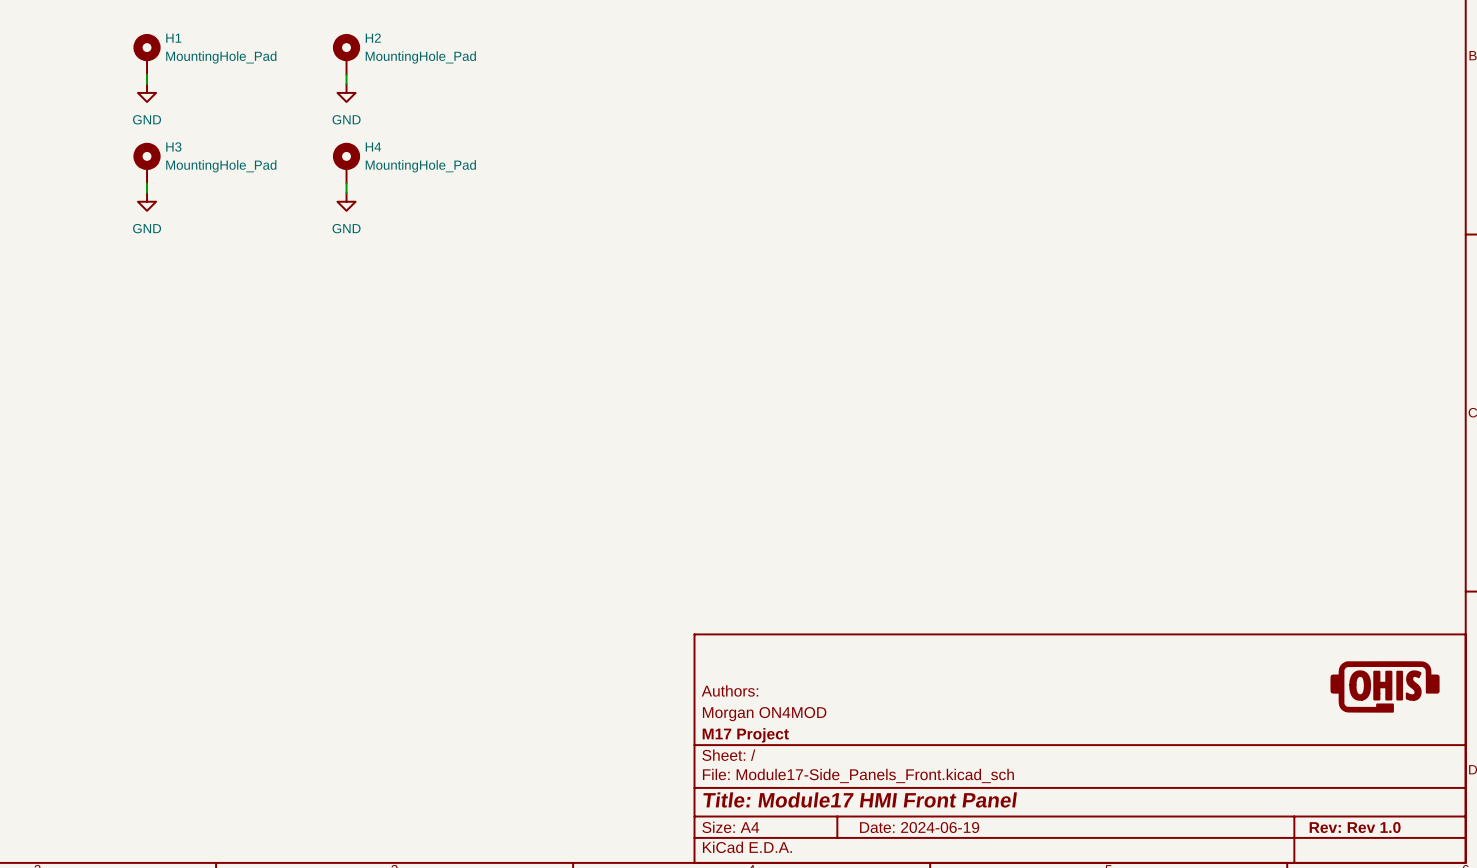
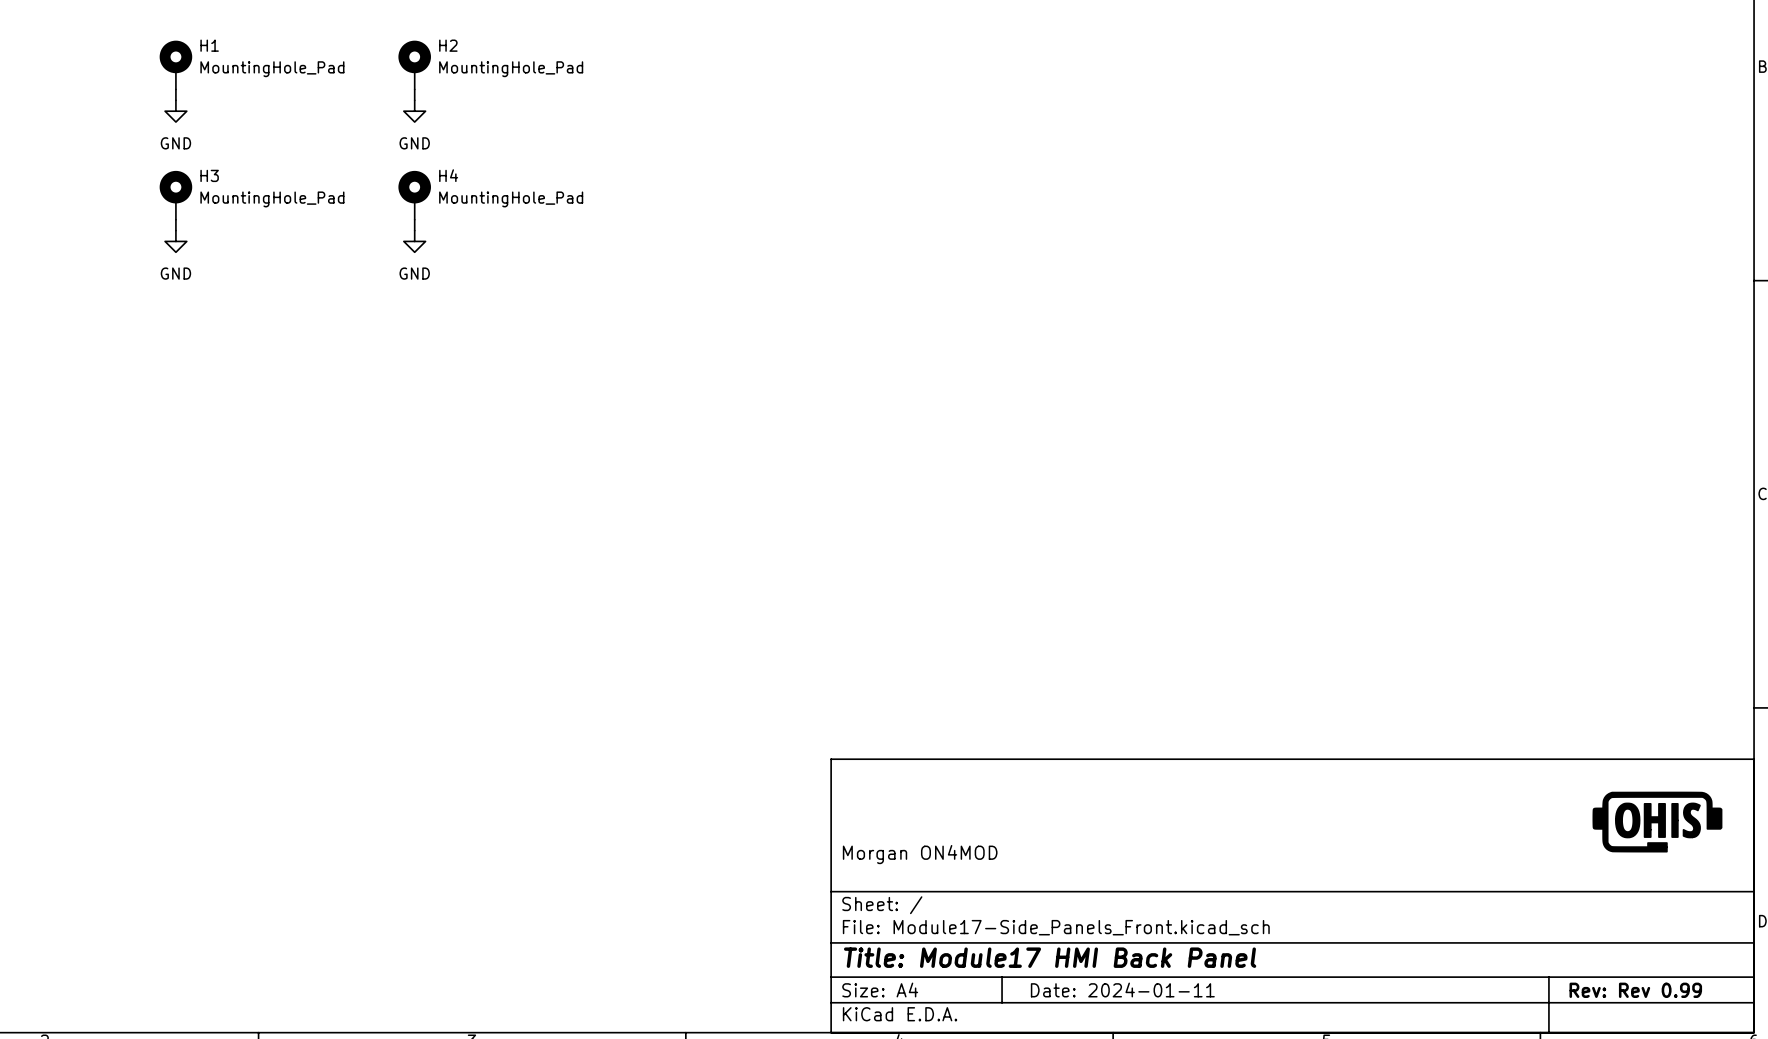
title block: Authors: (729, 690) -> none
title block: M17 Project (745, 735) -> none
title block: Title: Module17 HMI Front Panel (860, 799) -> Title: Module17 HMI Back Panel (1050, 957)
title block: Date: 2024-06-19 (919, 827) -> Date: 2024-01-11 (1122, 990)
title block: Rev: Rev 1.0 (1355, 827) -> Rev: Rev 0.99 (1635, 990)

